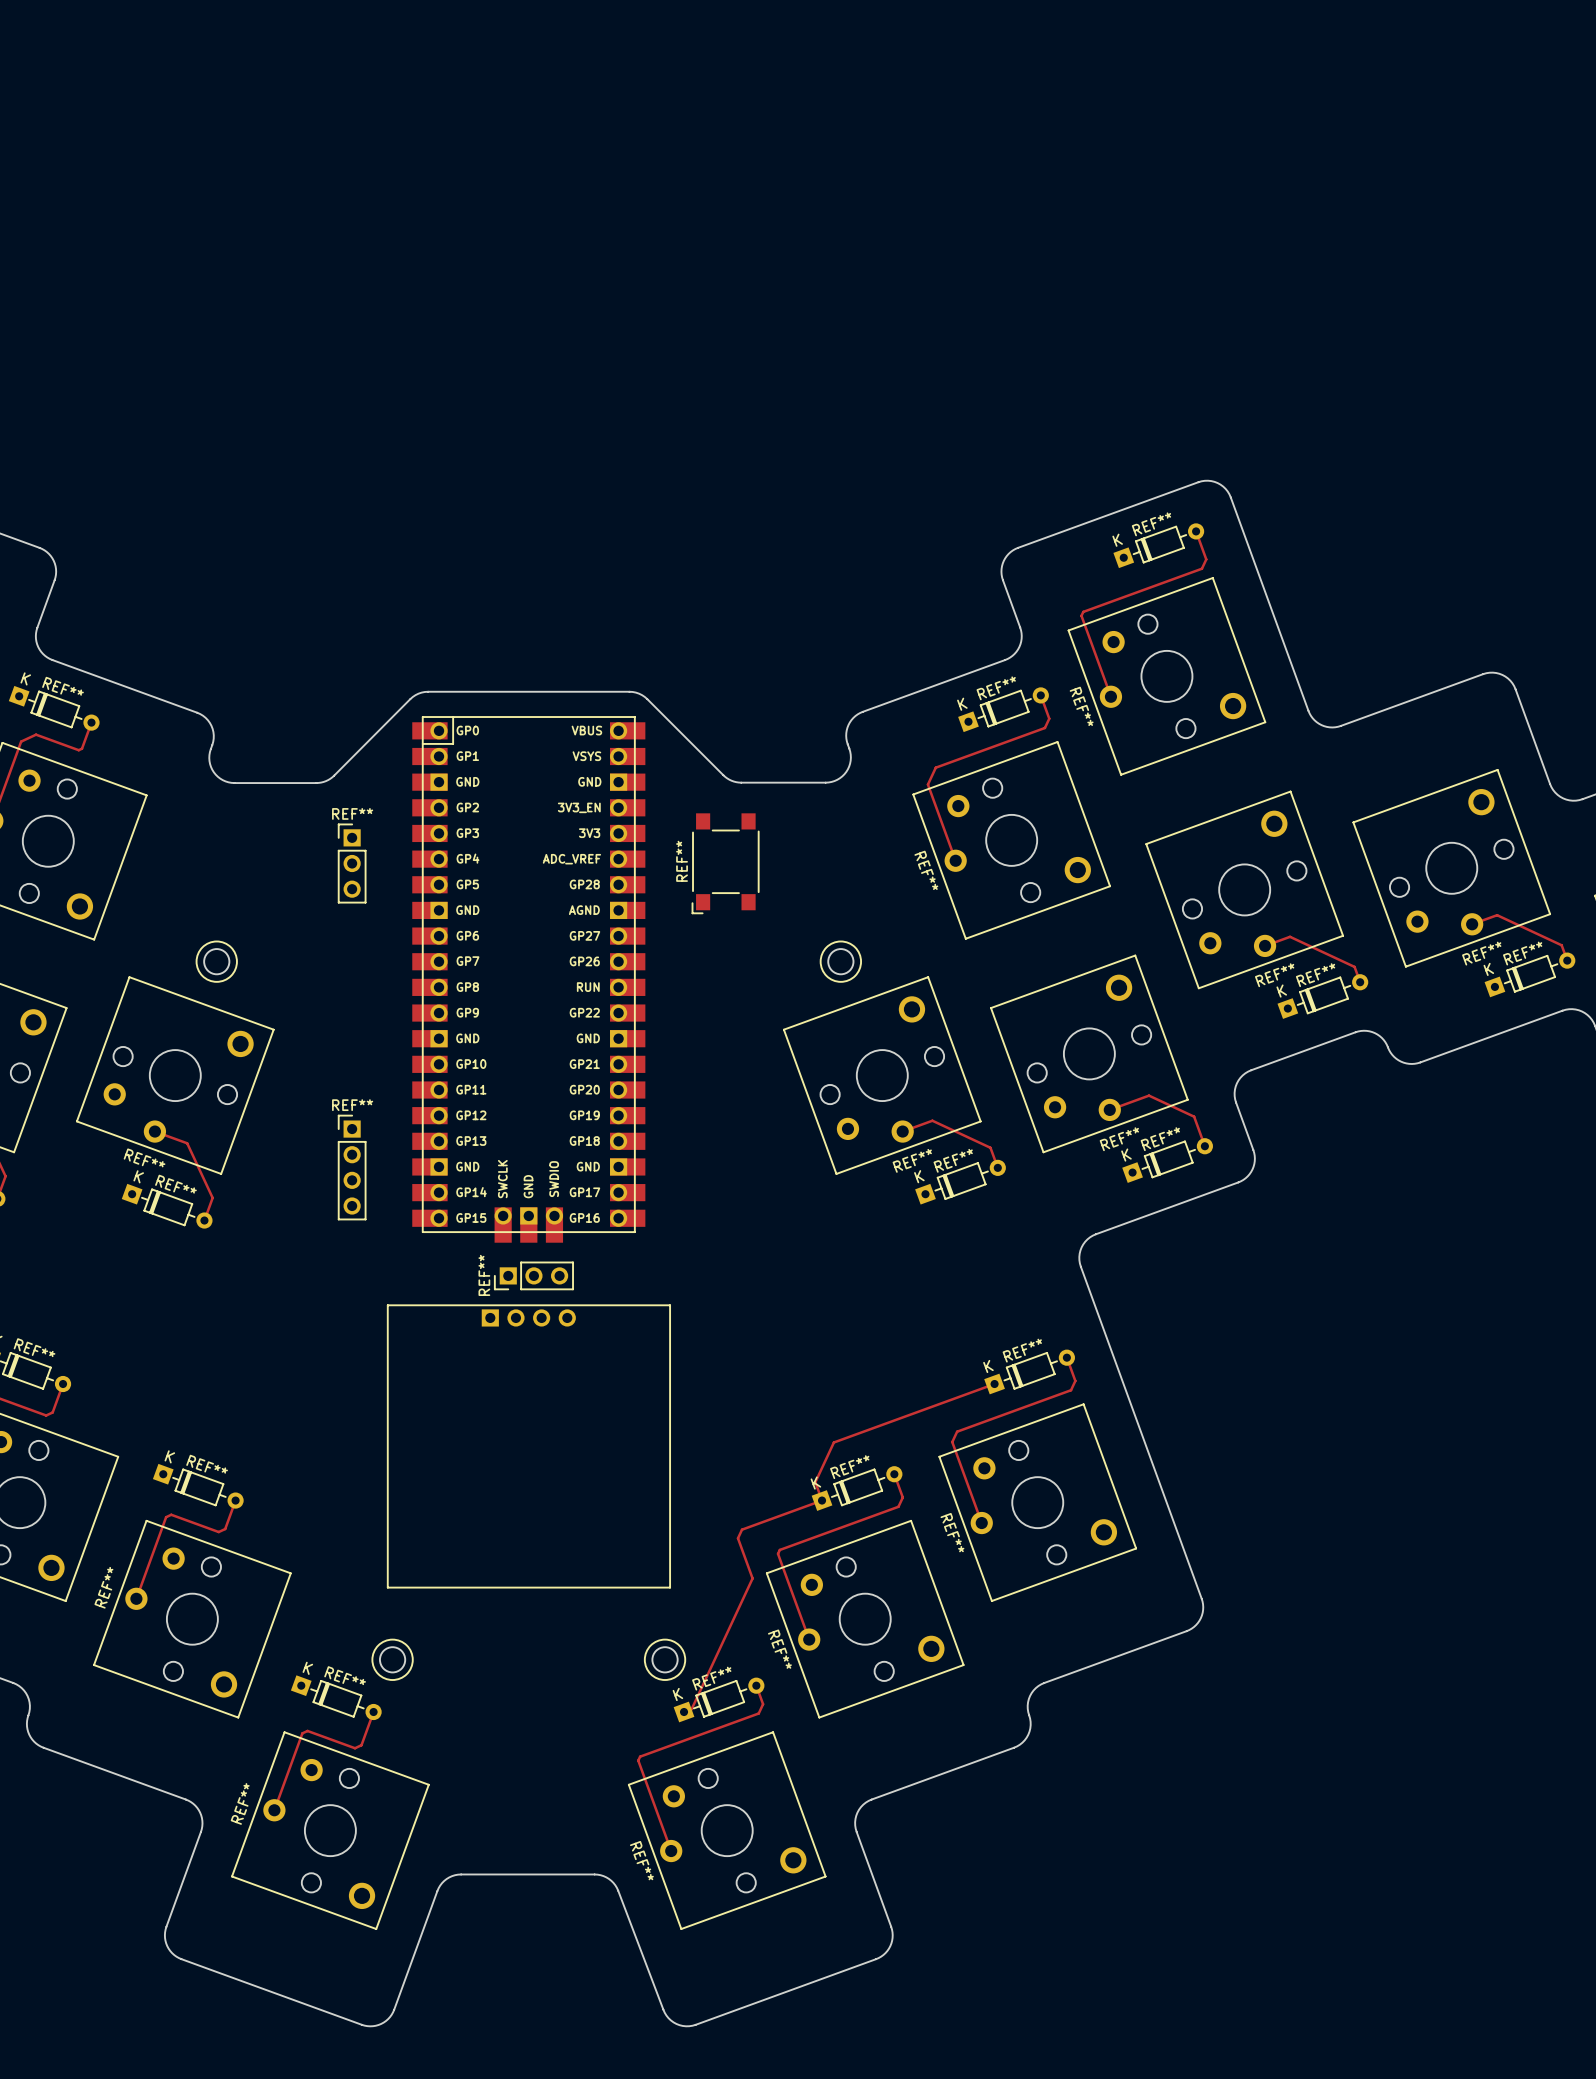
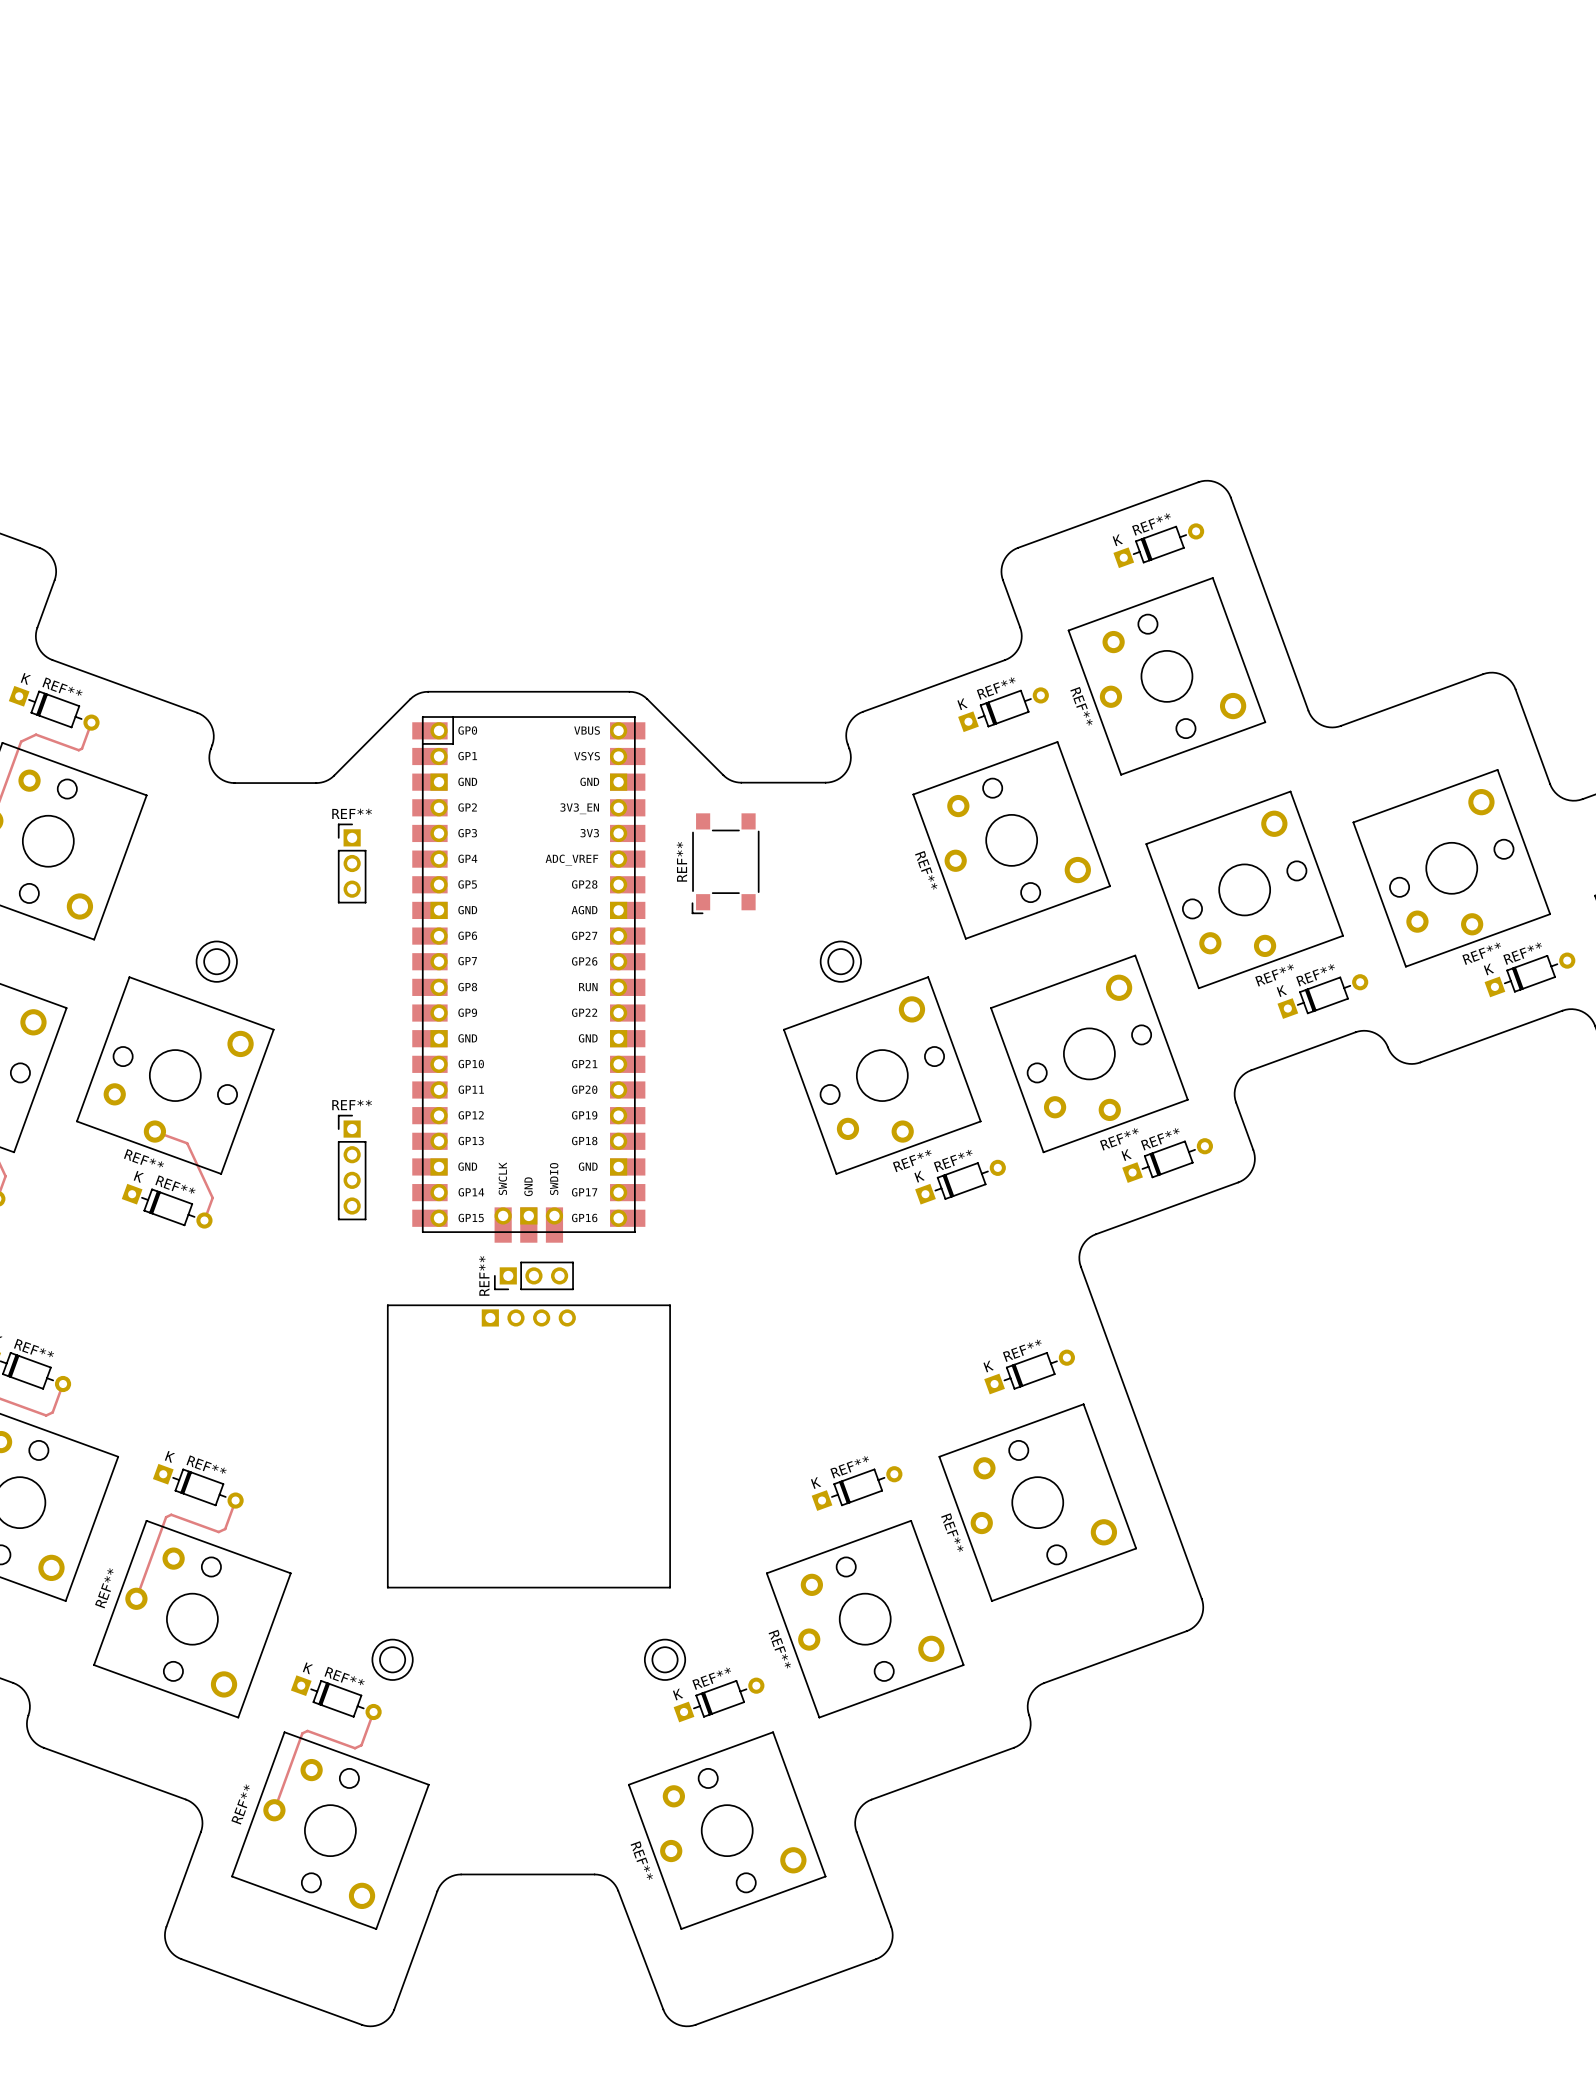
track: (1196, 531) (1206, 559) (1201, 568) (1083, 611) (1081, 615) (1110, 696) -> none
track: (1040, 695) (1049, 718) (1044, 727) (935, 767) (927, 784) (955, 860) -> none
track: (1472, 924) (1497, 915) (1561, 945) (1567, 960) -> none
track: (1265, 945) (1290, 936) (1354, 966) (1360, 982) -> none
track: (1109, 1109) (1149, 1095) (1194, 1116) (1204, 1146) -> none
track: (902, 1131) (932, 1120) (990, 1147) (997, 1167) -> none
track: (1066, 1357) (1075, 1380) (1071, 1390) (957, 1431) (952, 1442) (981, 1523) -> none
track: (994, 1384) (833, 1442) (815, 1482) (822, 1500) (742, 1529) (737, 1538) (752, 1578) (691, 1709) (684, 1712) -> none
track: (894, 1474) (902, 1497) (898, 1506) (779, 1549) (778, 1553) (809, 1639) -> none
track: (756, 1685) (763, 1704) (758, 1713) (640, 1756) (638, 1760) (671, 1851) -> none

